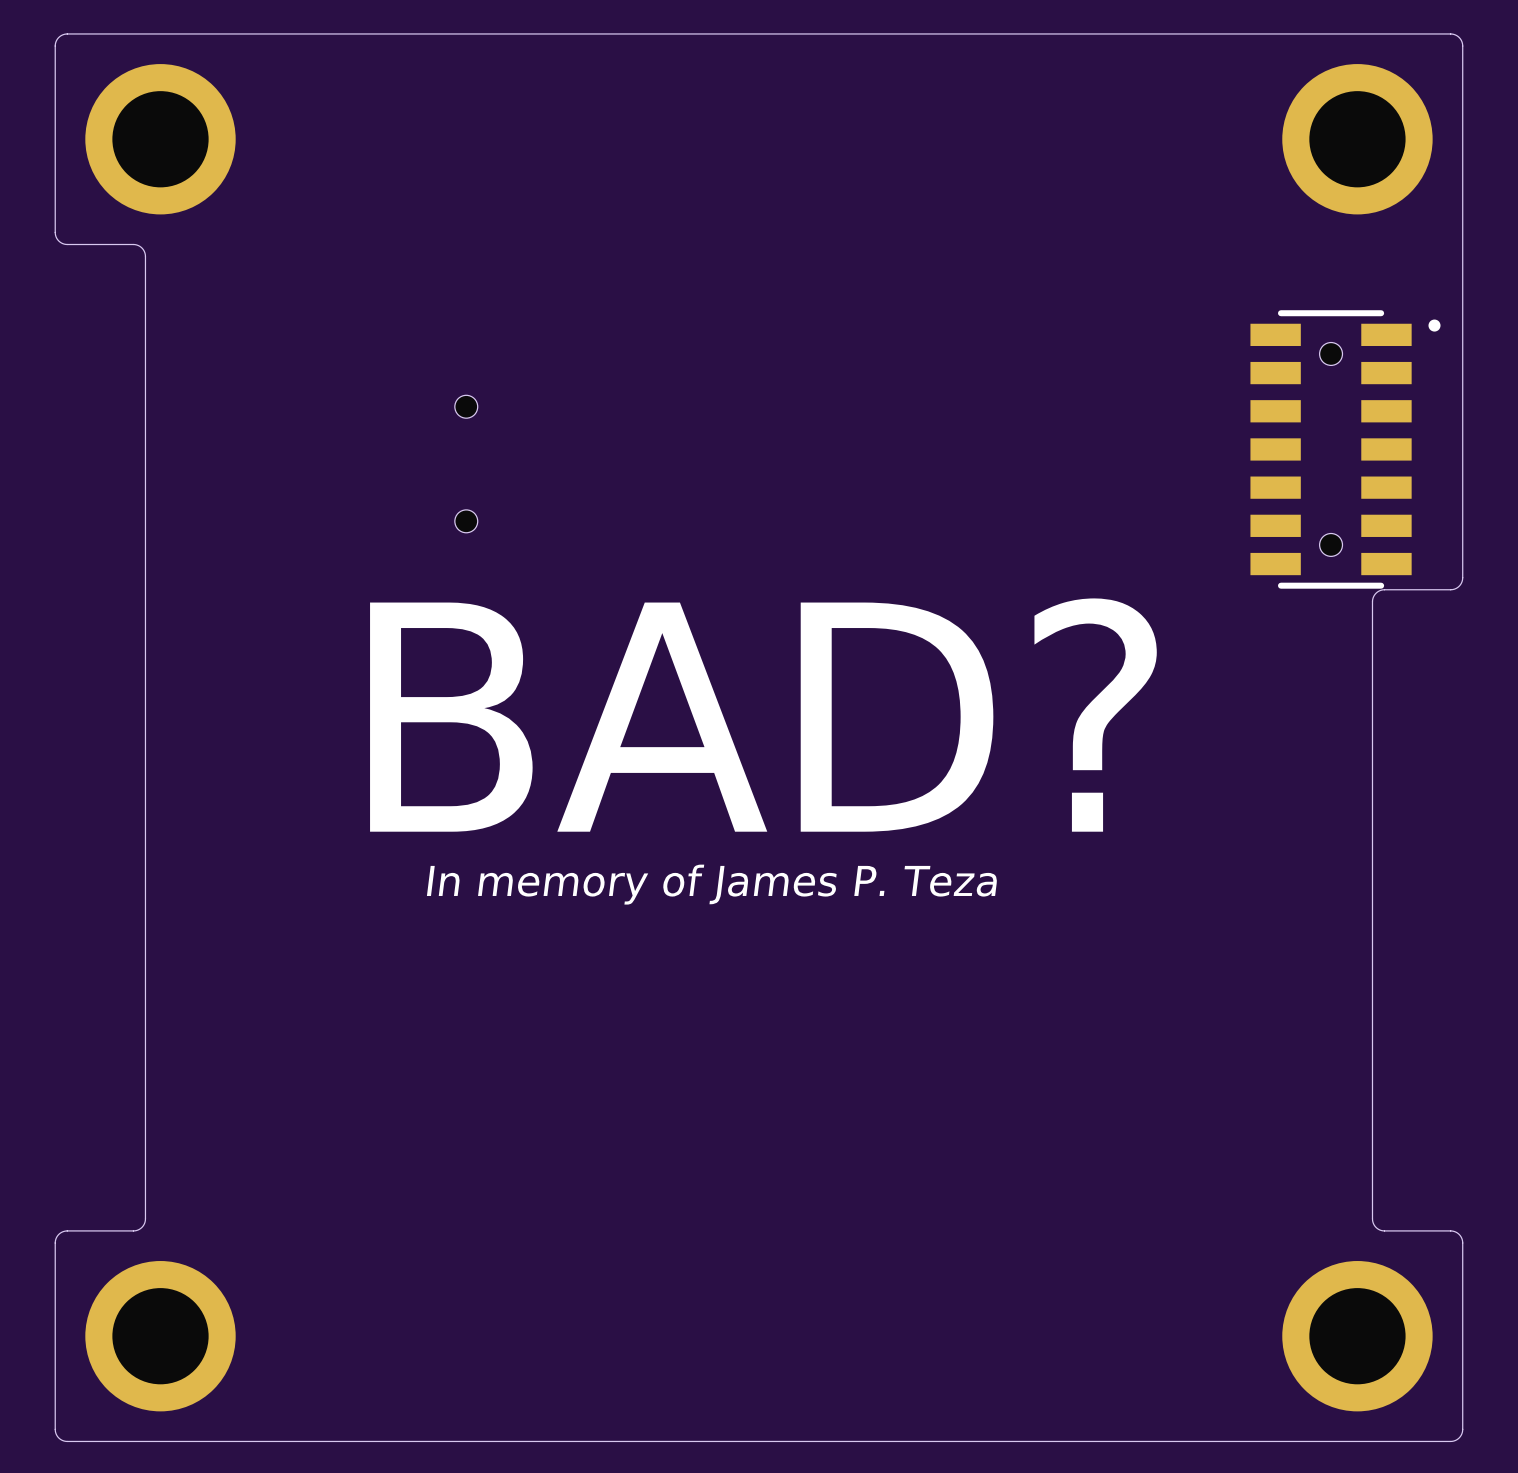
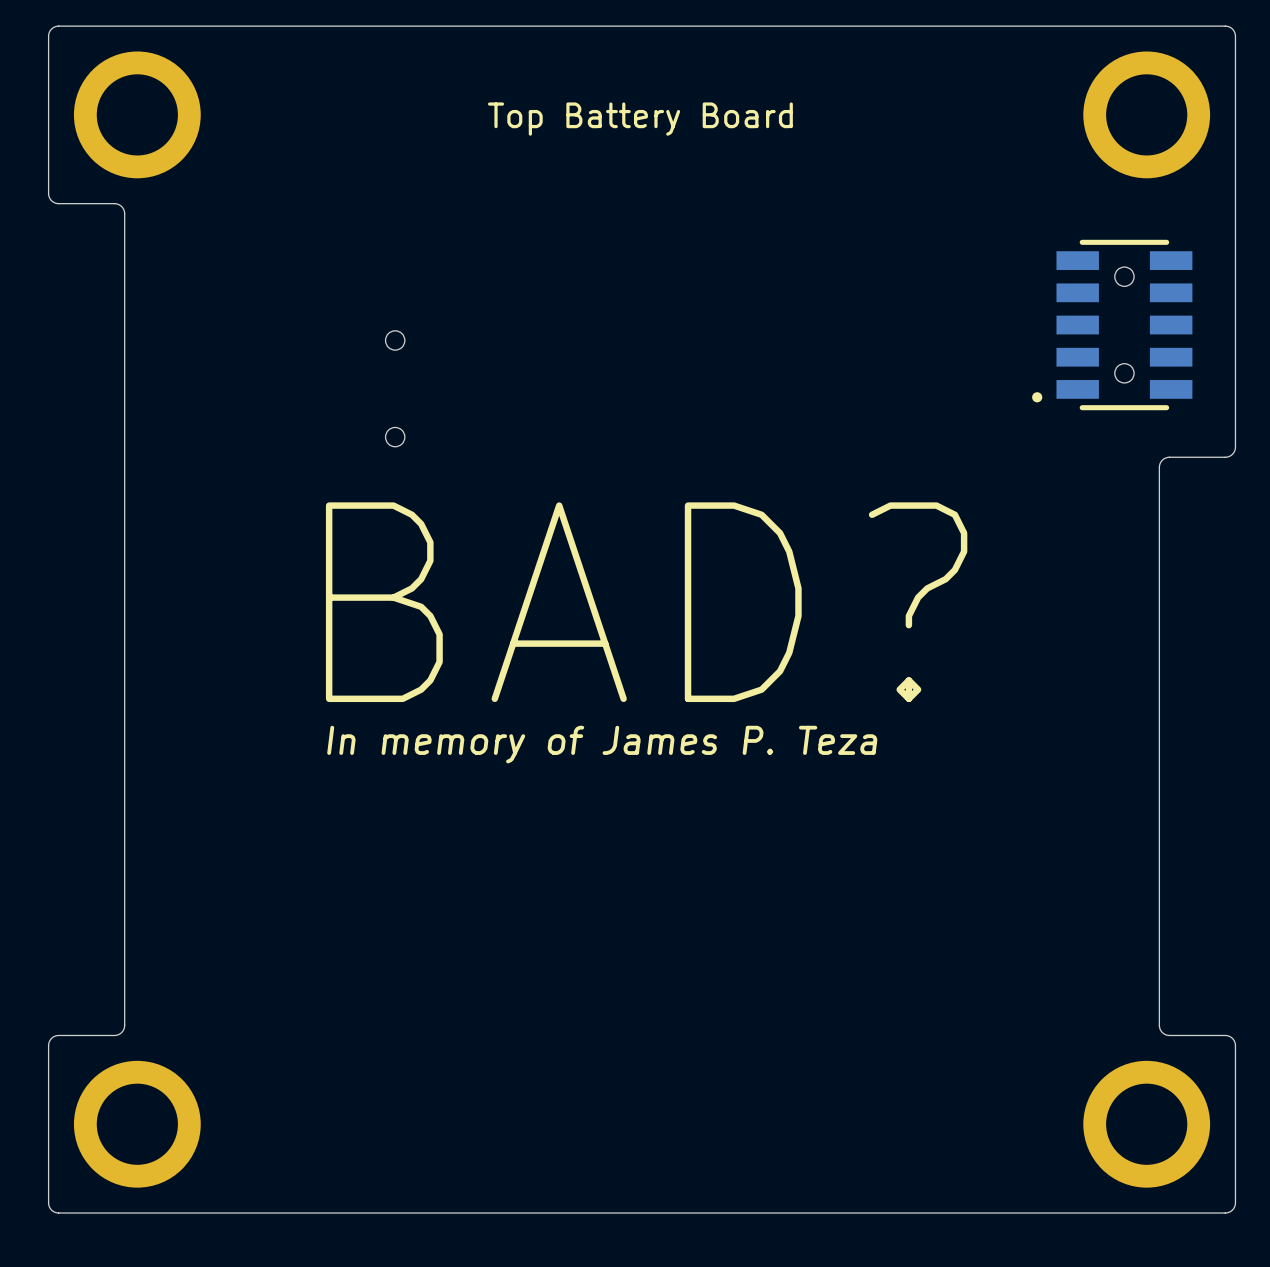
text: none -> Top Battery Board (640, 119)
part: none -> (1112, 325)
part: (1345, 449) -> none
board edge: (1462, 533) (1462, 579) (1458, 587) (1450, 589) (1381, 590) (1375, 594) (1372, 601) -> (1235, 447) (1233, 453) (1227, 457) (1169, 457) (1163, 459) (1159, 466) (1159, 504)

